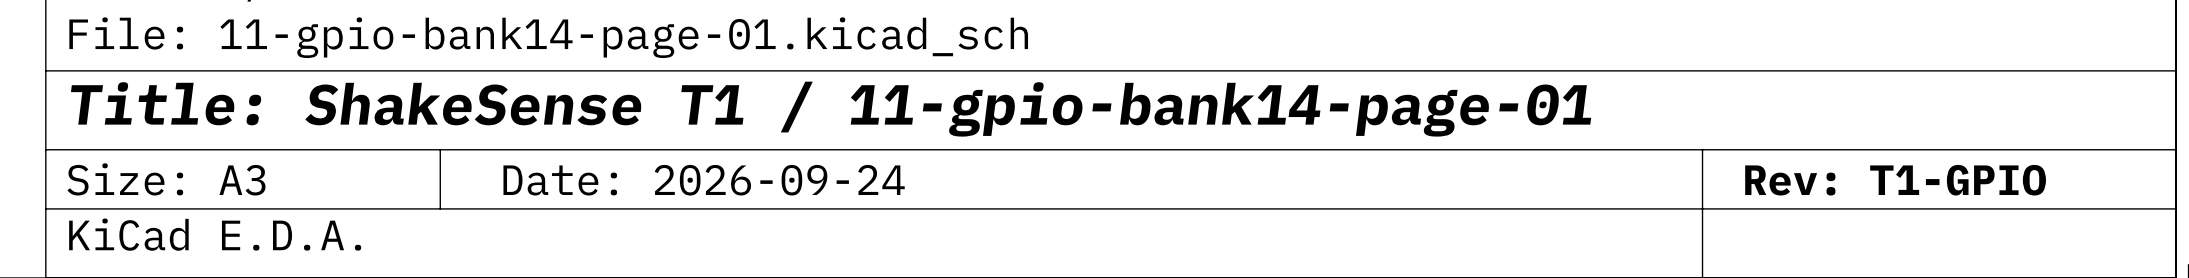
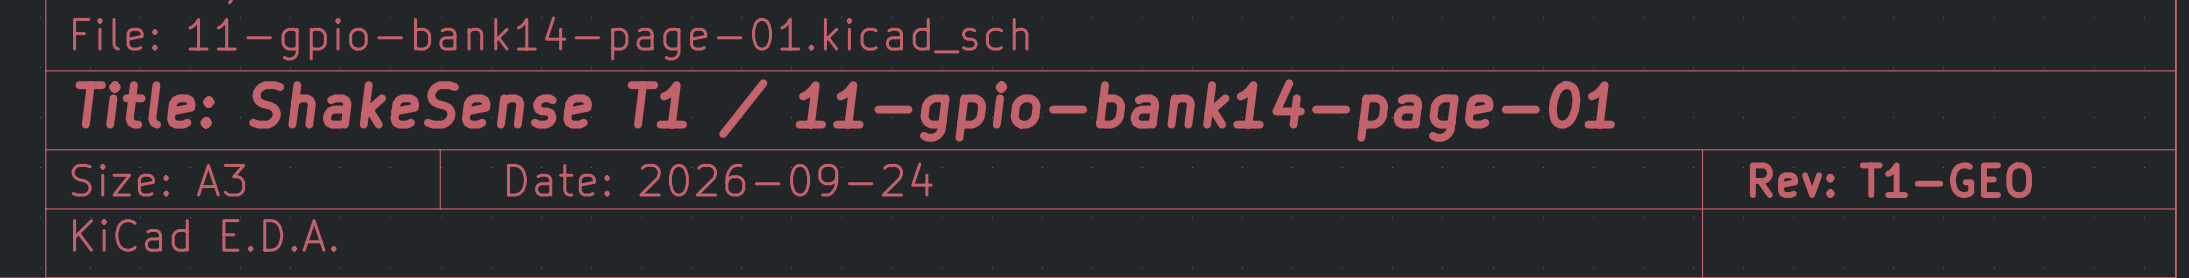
title block: Rev: T1-GPIO (1895, 180) -> Rev: T1-GEO (1890, 180)

